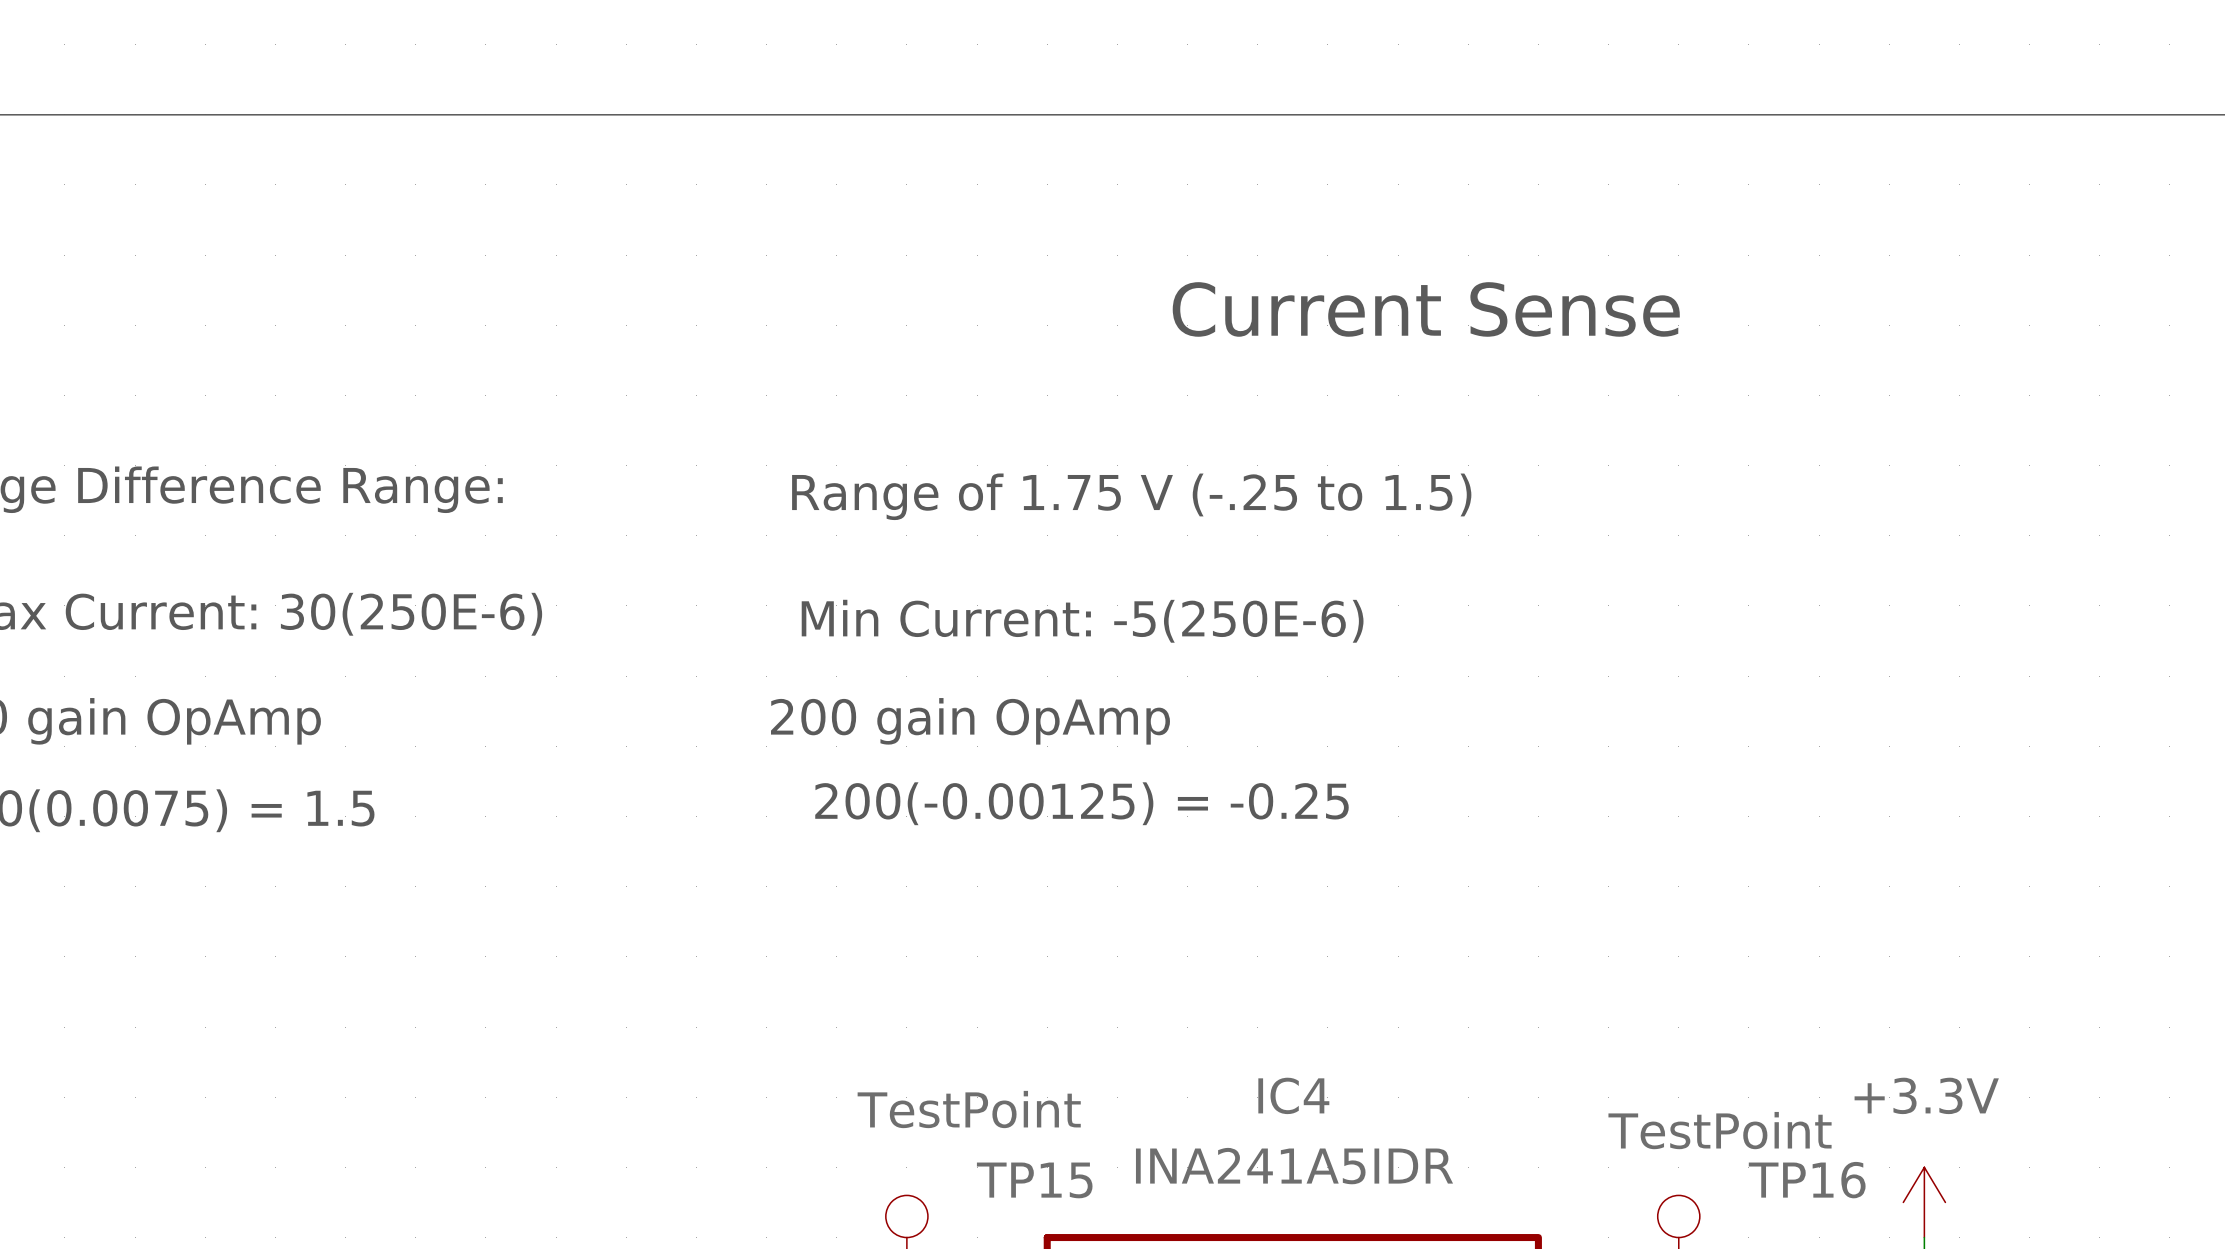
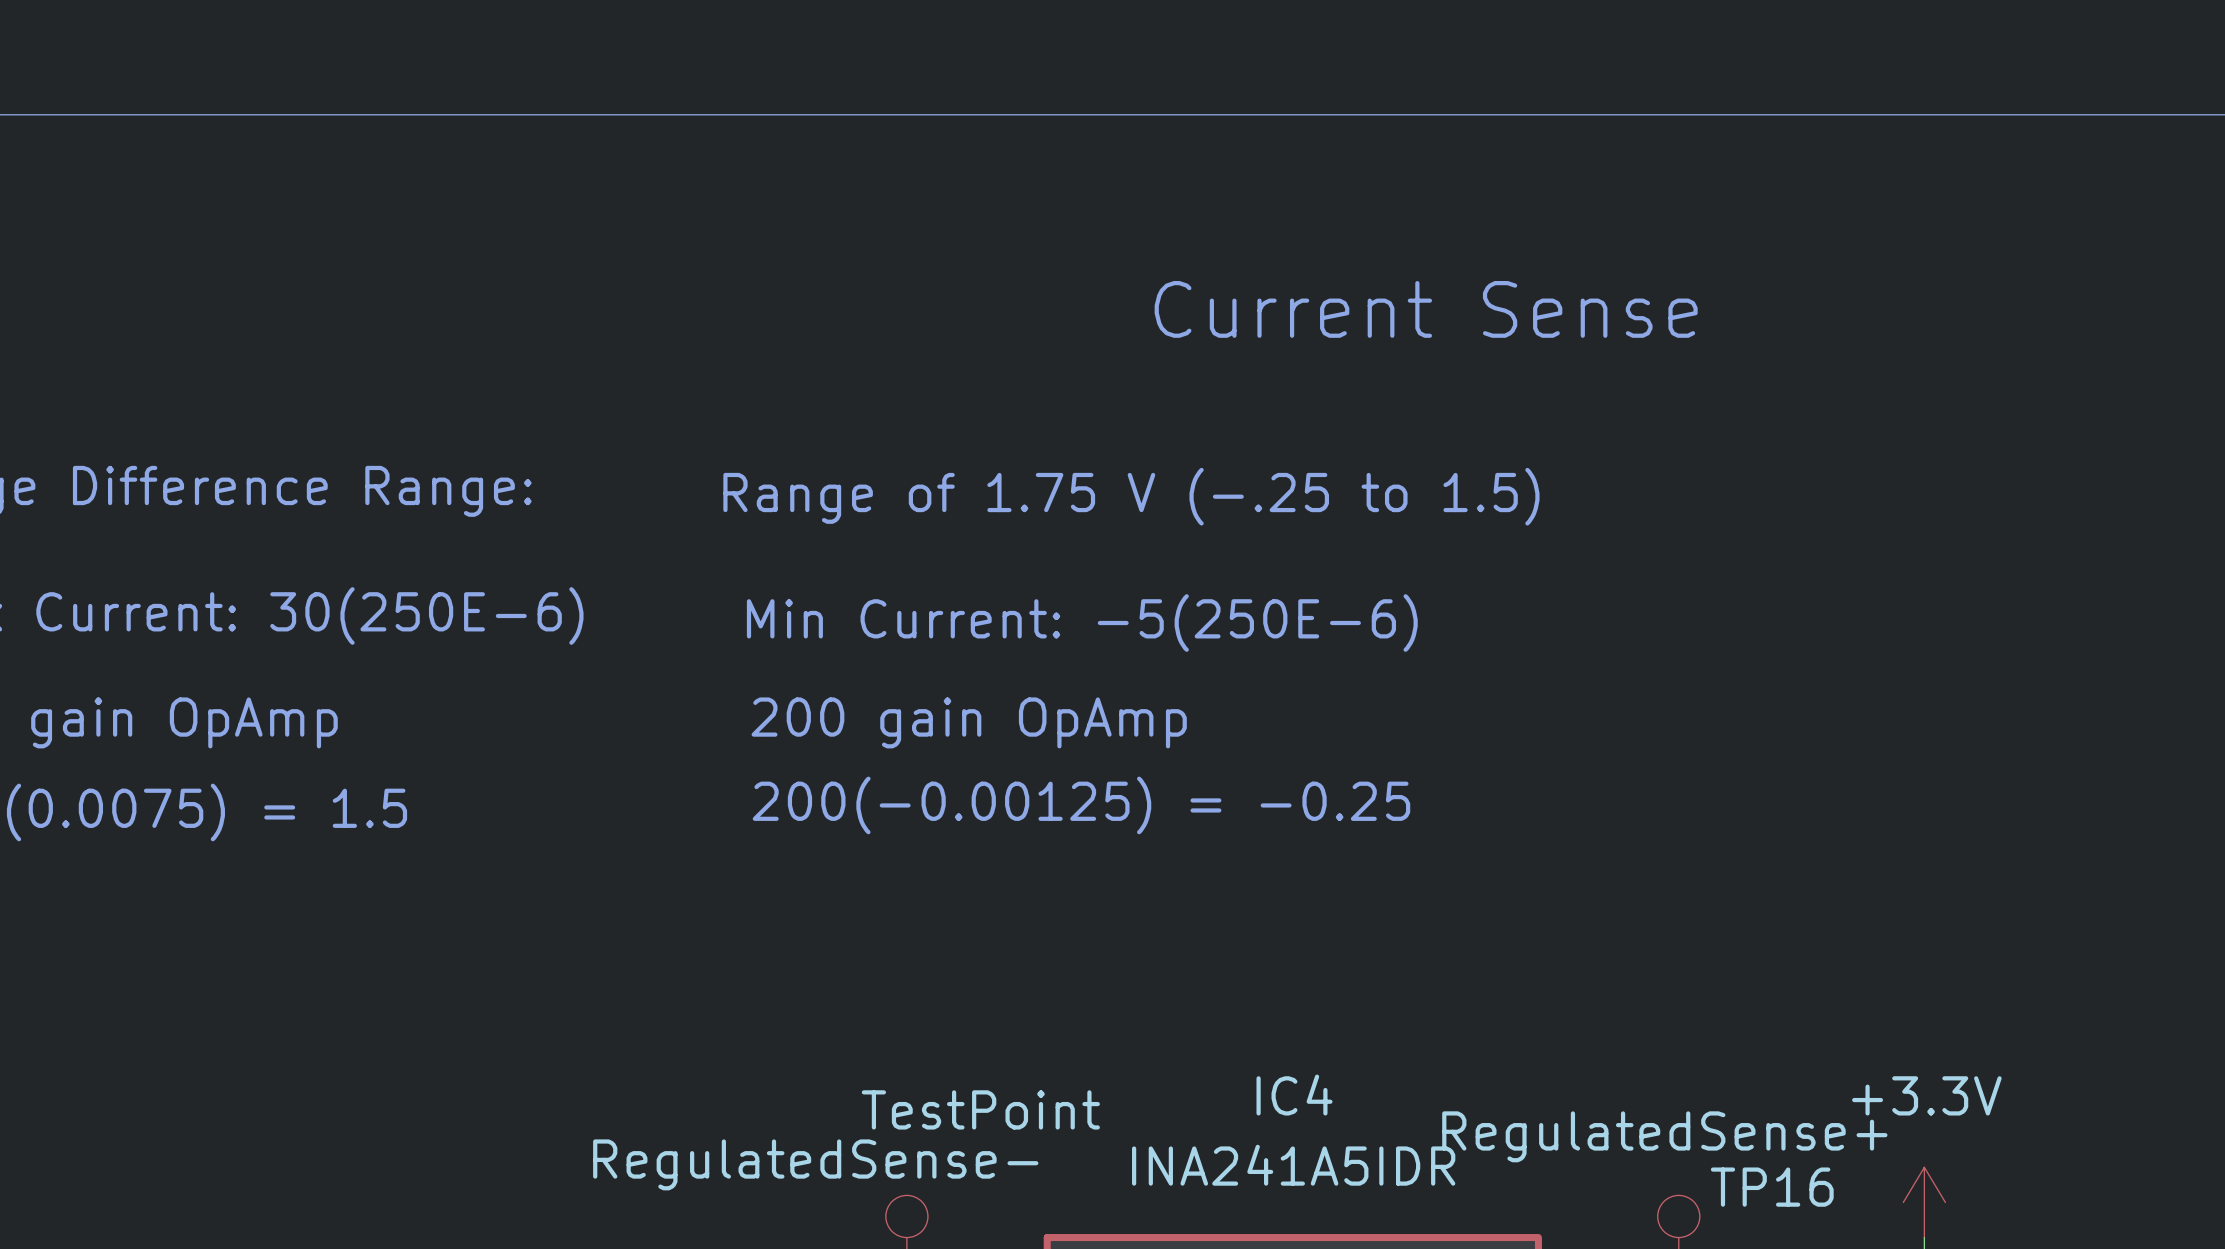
TP16 value: TestPoint (1720, 1130) -> RegulatedSense+ (1664, 1136)
TP15 name: TP15 (1034, 1180) -> RegulatedSense- (815, 1164)
TP16 name position: TP16 (1807, 1180) -> TP16 (1772, 1187)

